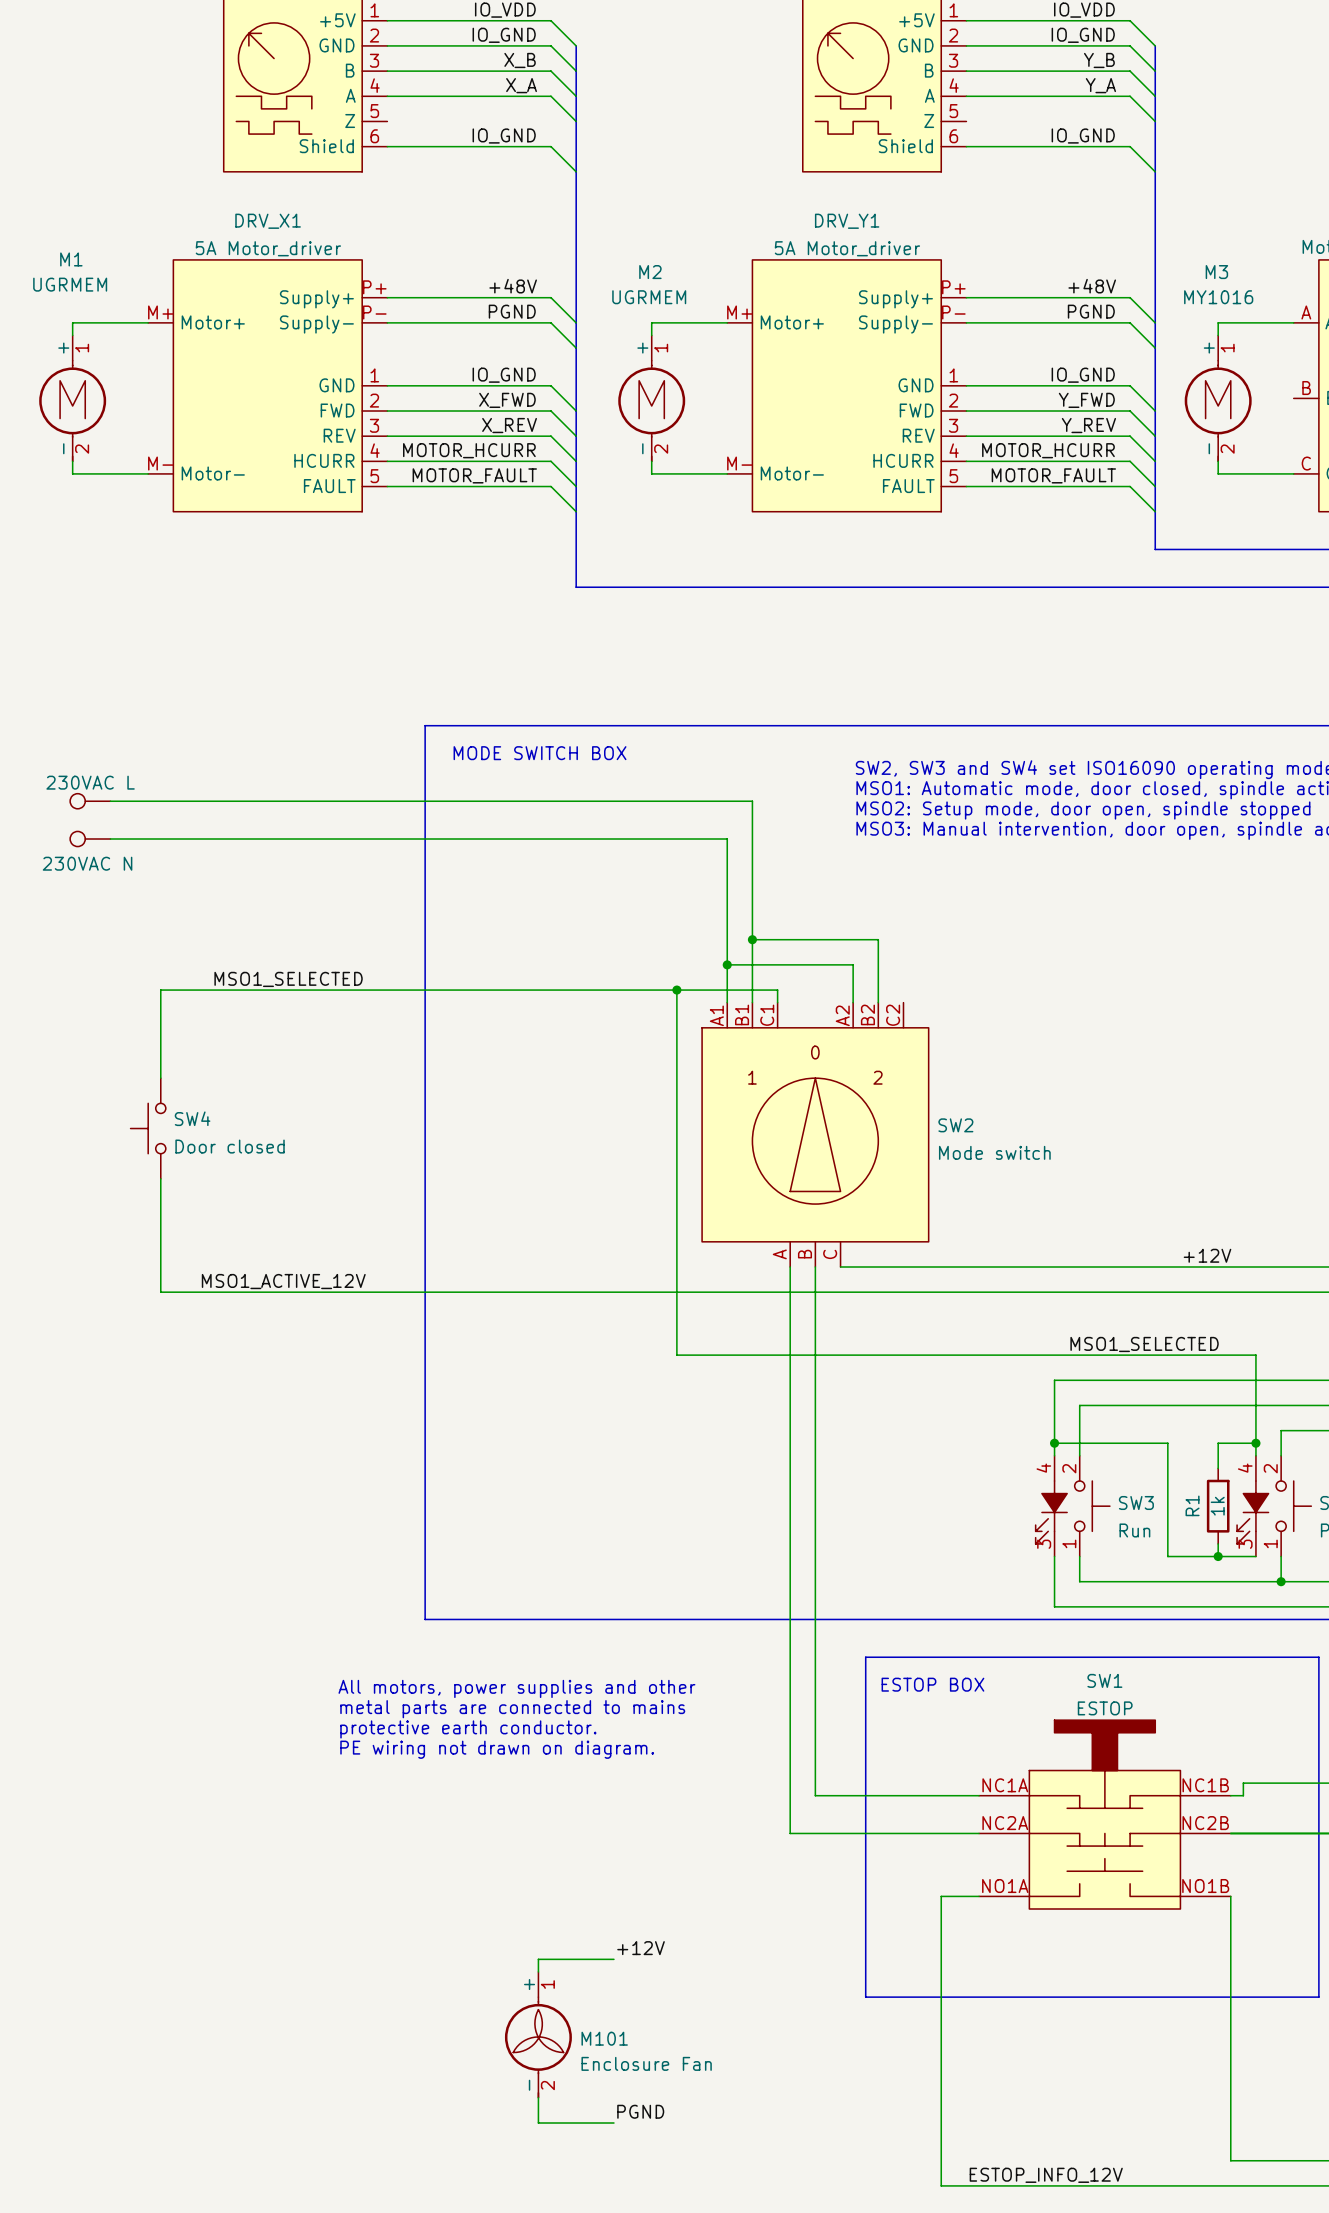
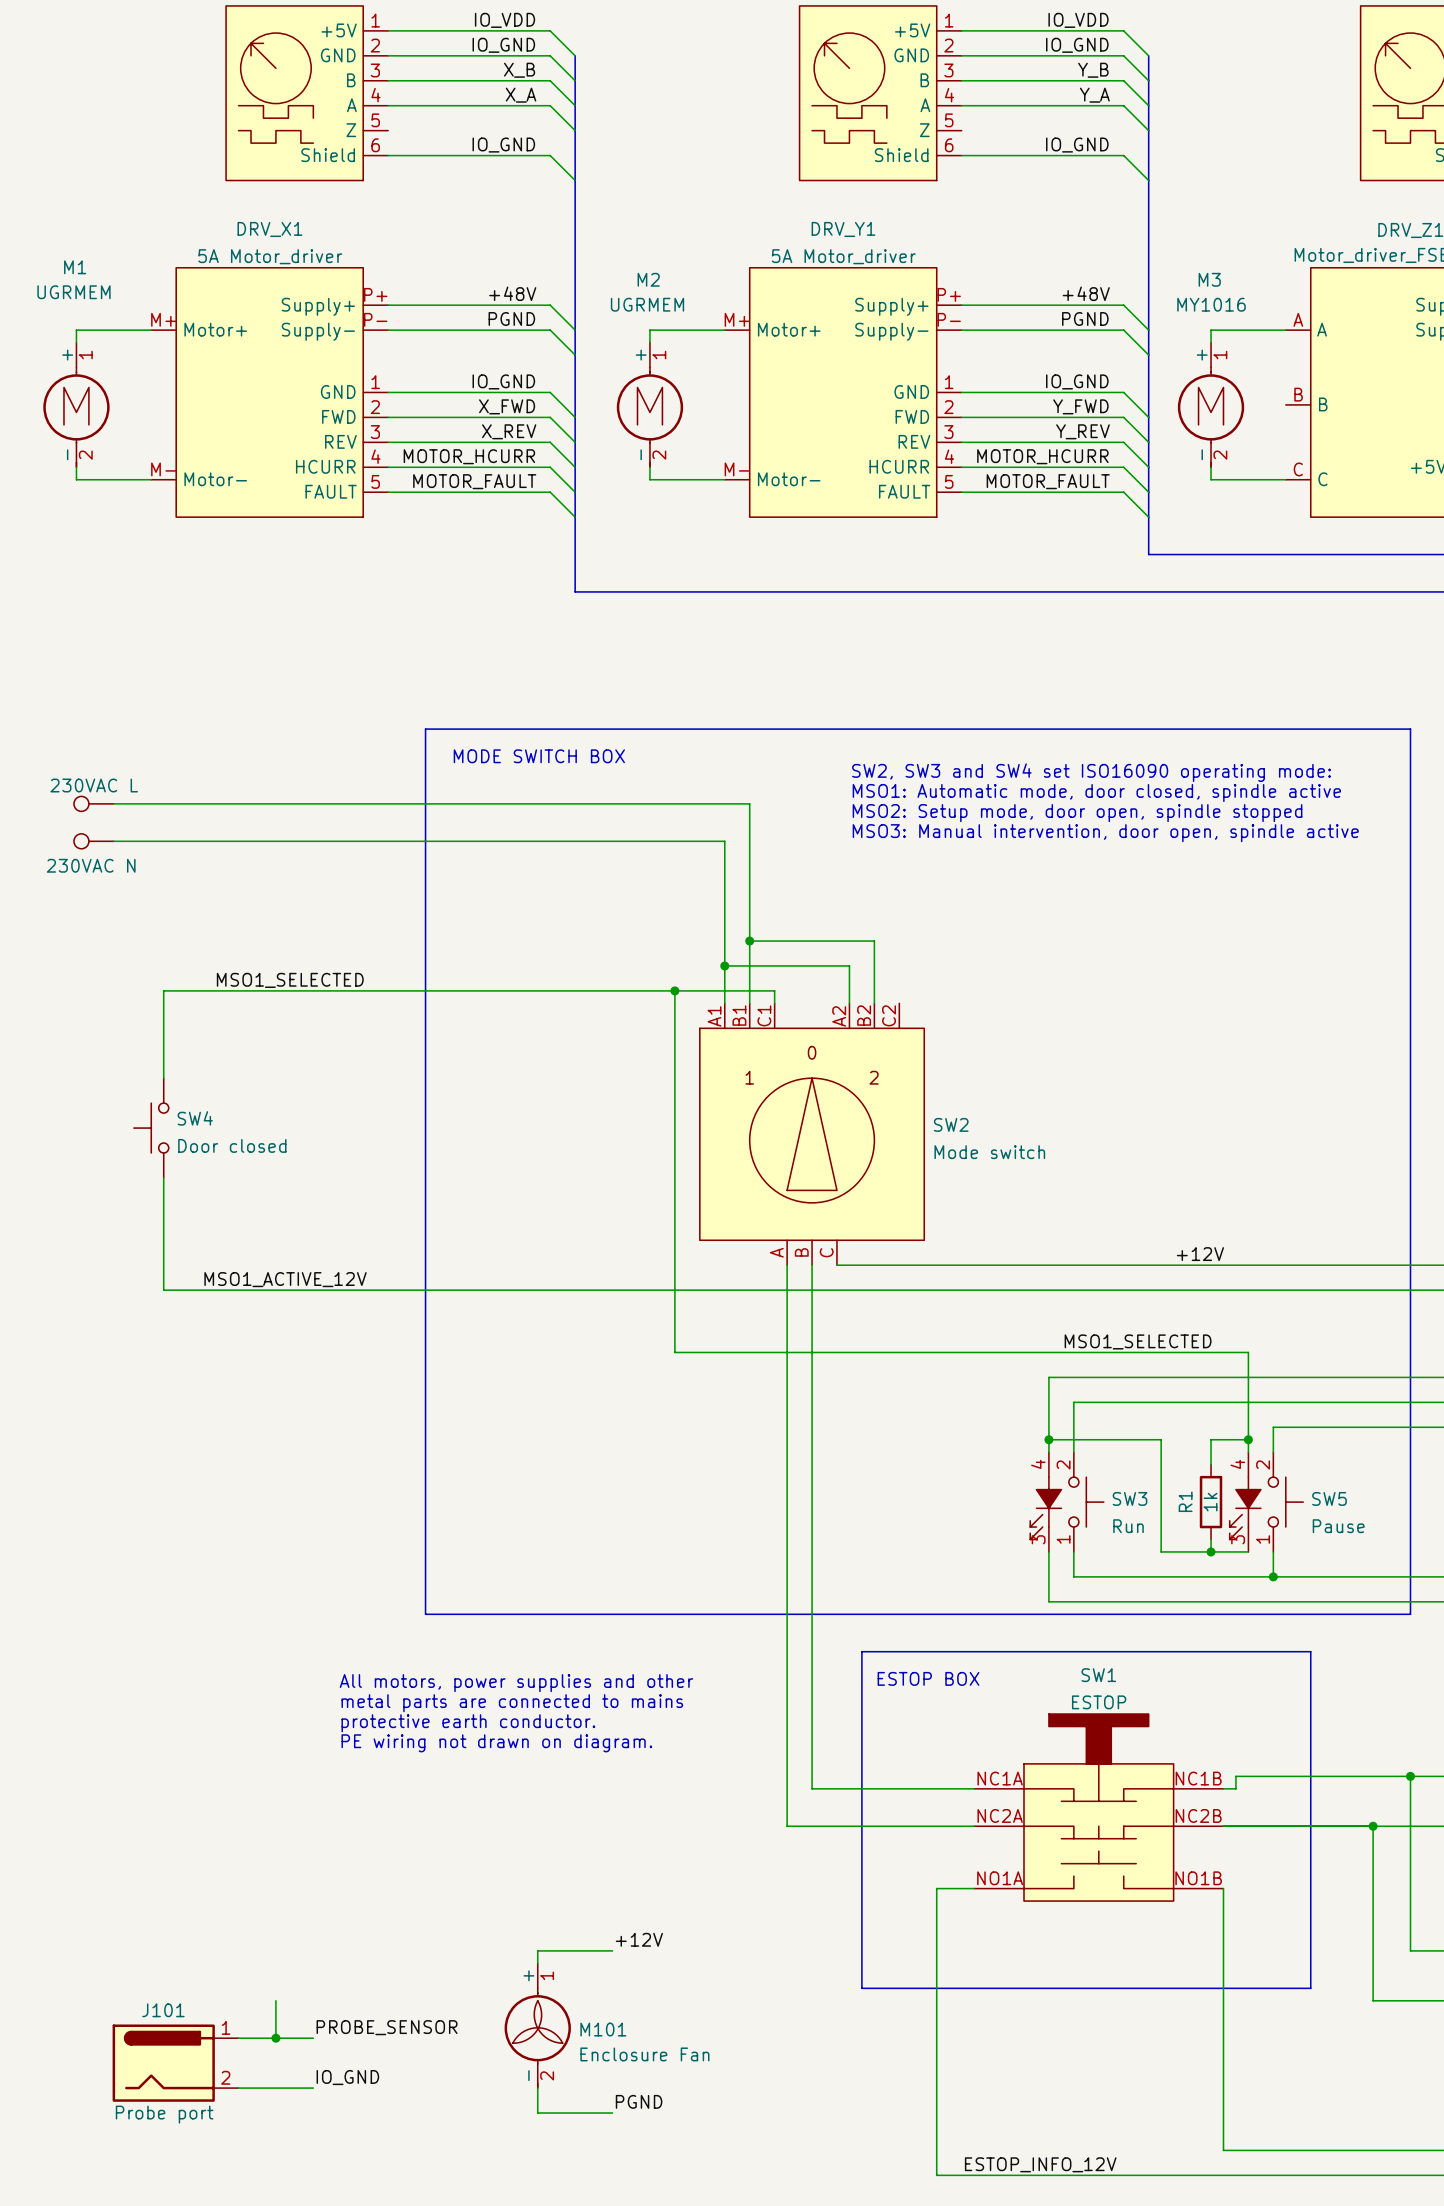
wire: none -> (275, 2000) (275, 2038)
label: none -> PROBE_SENSOR (387, 2027)
wire: none -> (238, 2038) (313, 2038)
junction: none -> (275, 2038)
J101: none -> Probe port (175, 2063)
label: none -> IO_GND (347, 2077)
wire: none -> (238, 2088) (313, 2088)

